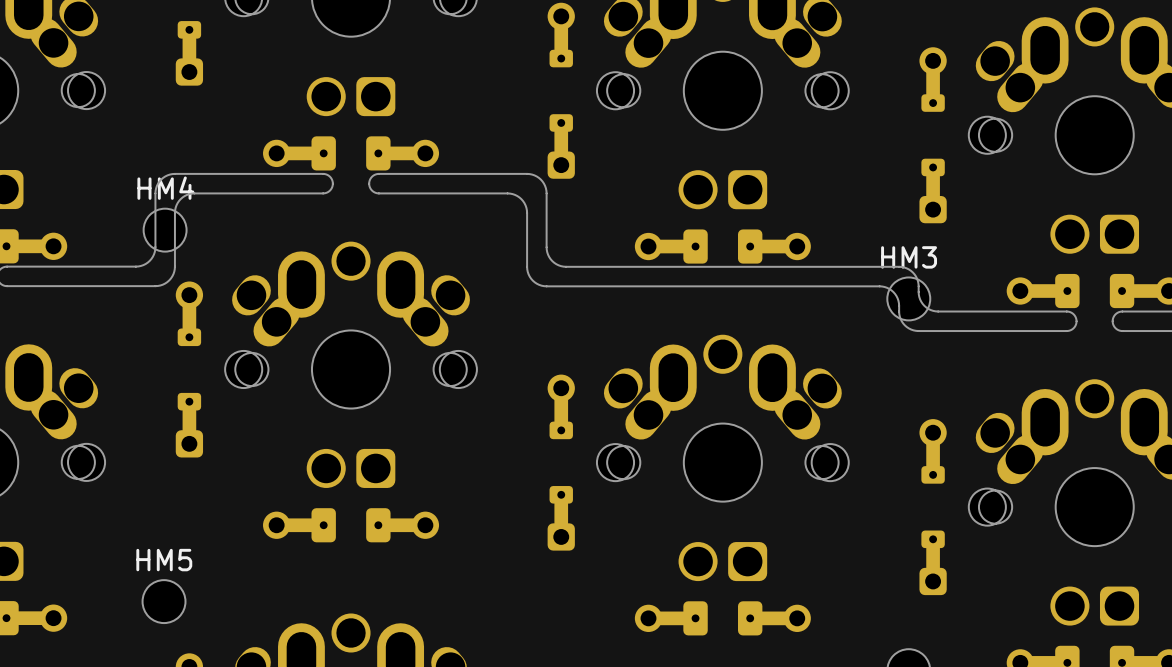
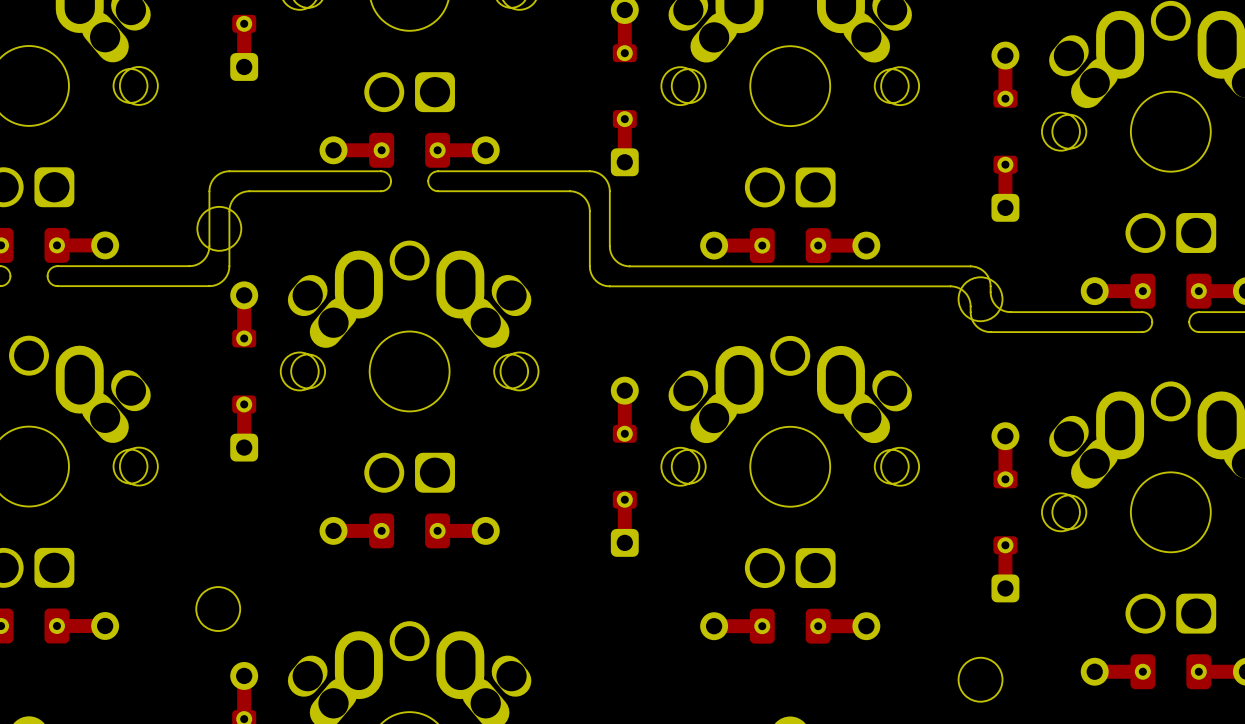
HM4 name: HM4 (165, 188) -> none
HM3 name: HM3 (909, 257) -> none
HM5 name: HM5 (164, 560) -> none

